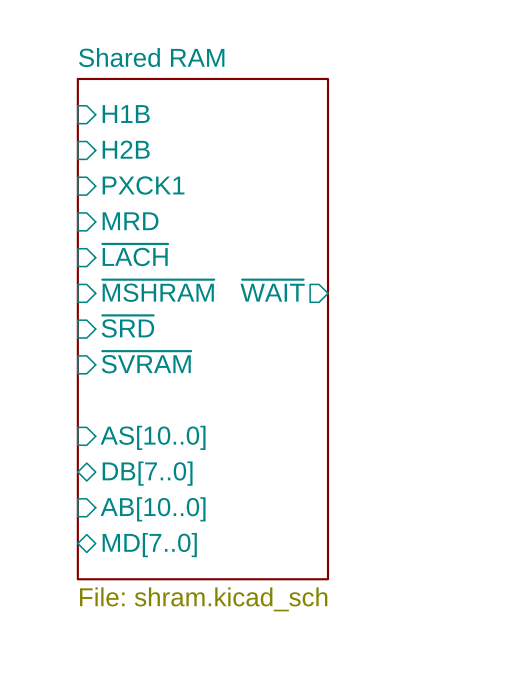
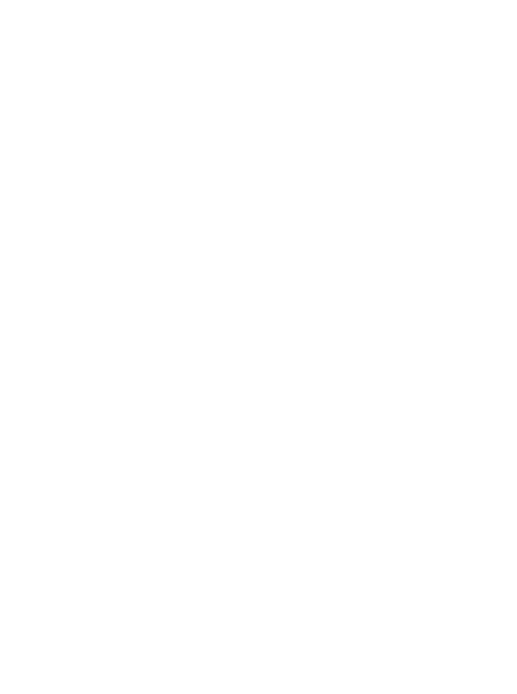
sheet pin: H1B (126, 114) -> none
sheet pin: H2B (126, 149) -> none
sheet pin: PXCK1 (143, 185) -> none
sheet pin: MRD (130, 221) -> none
sheet pin: ~{LACH} (135, 255) -> none
sheet pin: ~{MSHRAM} (158, 290) -> none
sheet pin: ~{WAIT} (272, 290) -> none
sheet pin: ~{SRD} (127, 326) -> none
sheet Shared RAM: File: shram.kicad_sch (202, 329) -> none
sheet pin: ~{SVRAM} (146, 362) -> none
sheet pin: AS[10..0] (153, 437) -> none
sheet pin: DB[7..0] (147, 473) -> none
sheet pin: AB[10..0] (153, 509) -> none
sheet pin: MD[7..0] (149, 545) -> none

